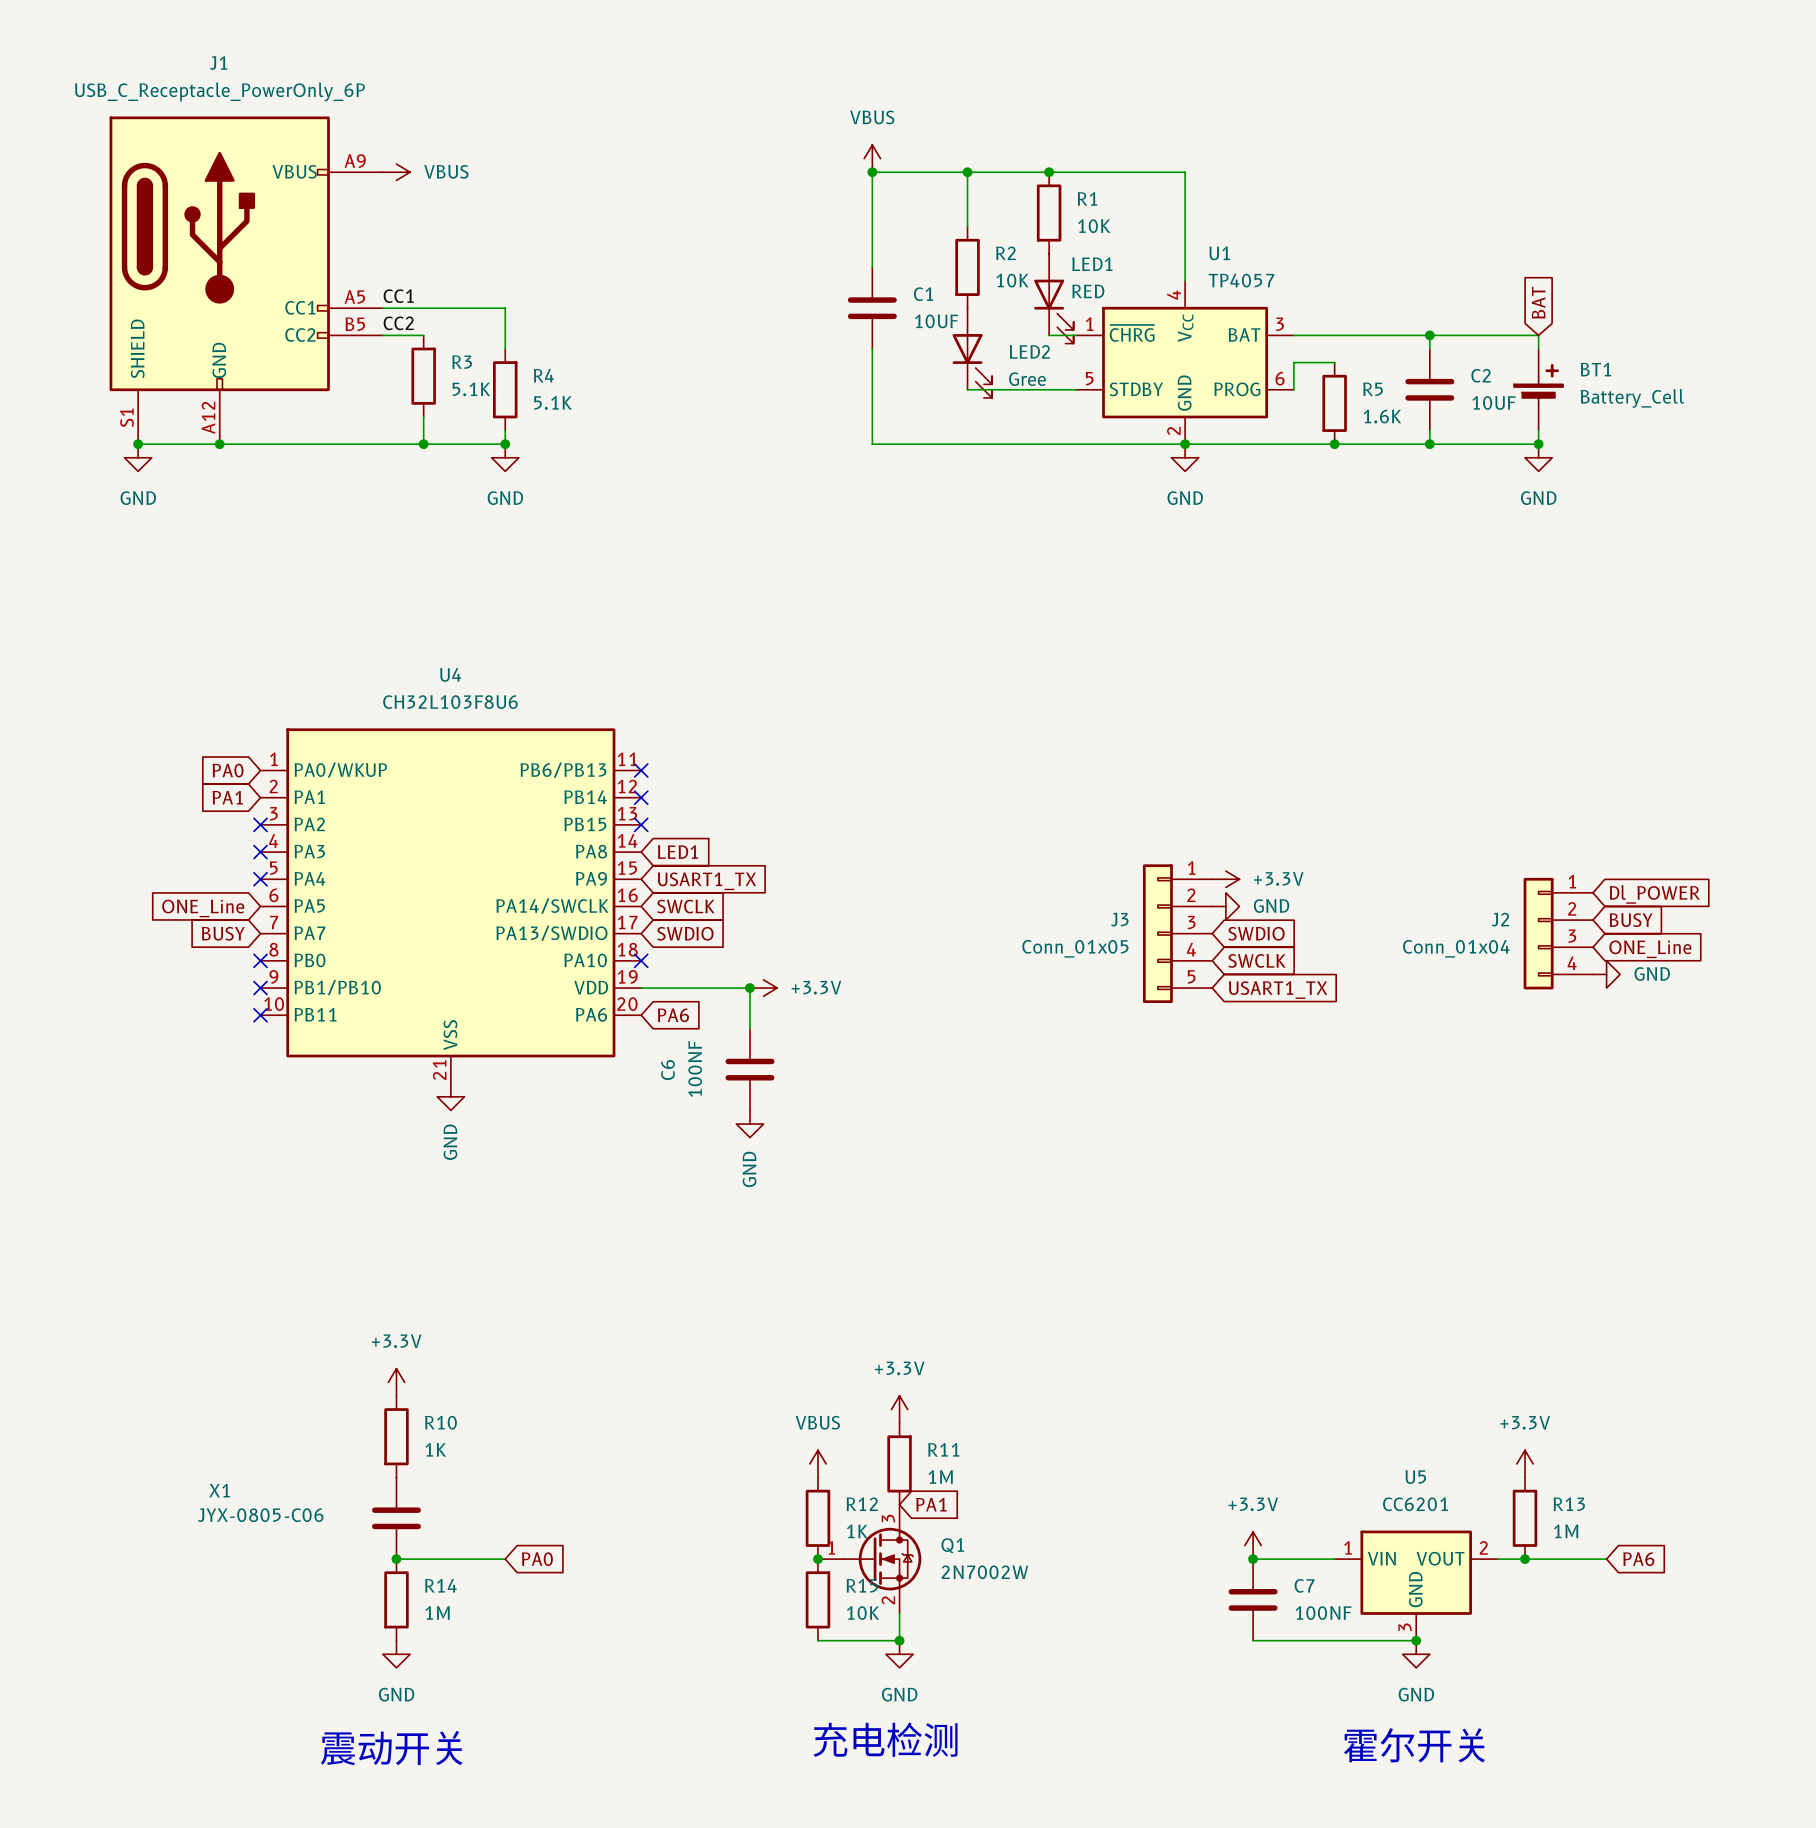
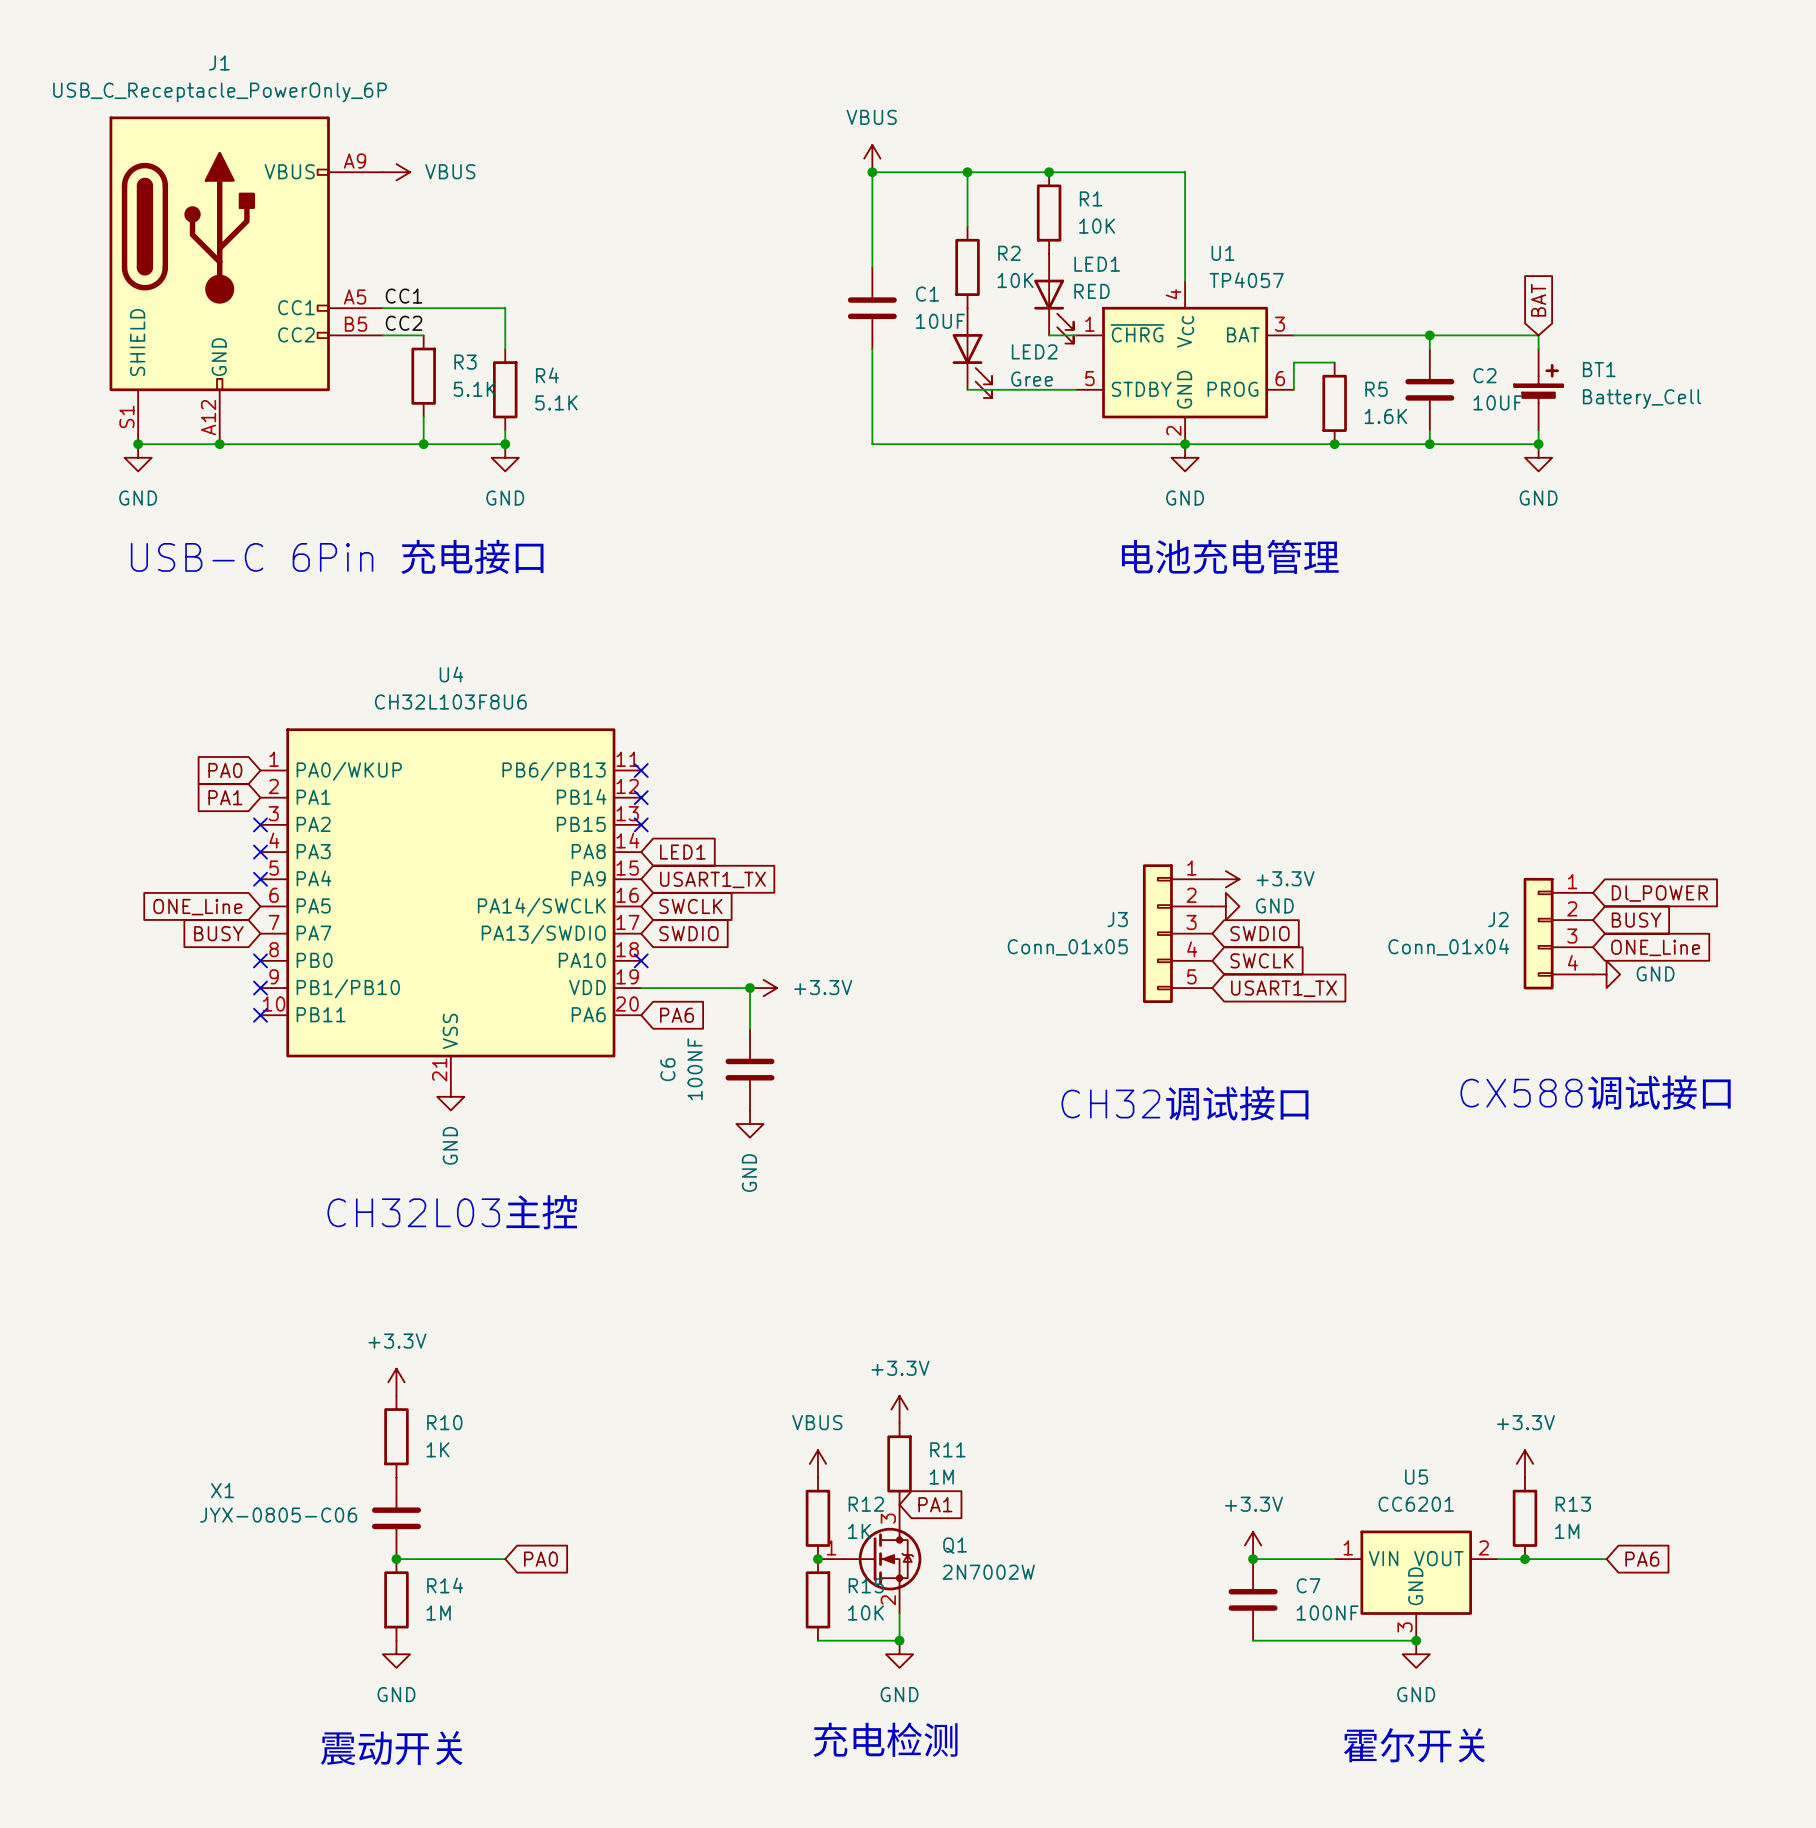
text: none -> USB-C 6Pin 充电接口 (337, 556)
text: none -> 电池充电管理 (1230, 556)
text: none -> CX588调试接口 (1595, 1092)
text: none -> CH32调试接口 (1185, 1103)
text: none -> CH32L03主控 (452, 1212)

